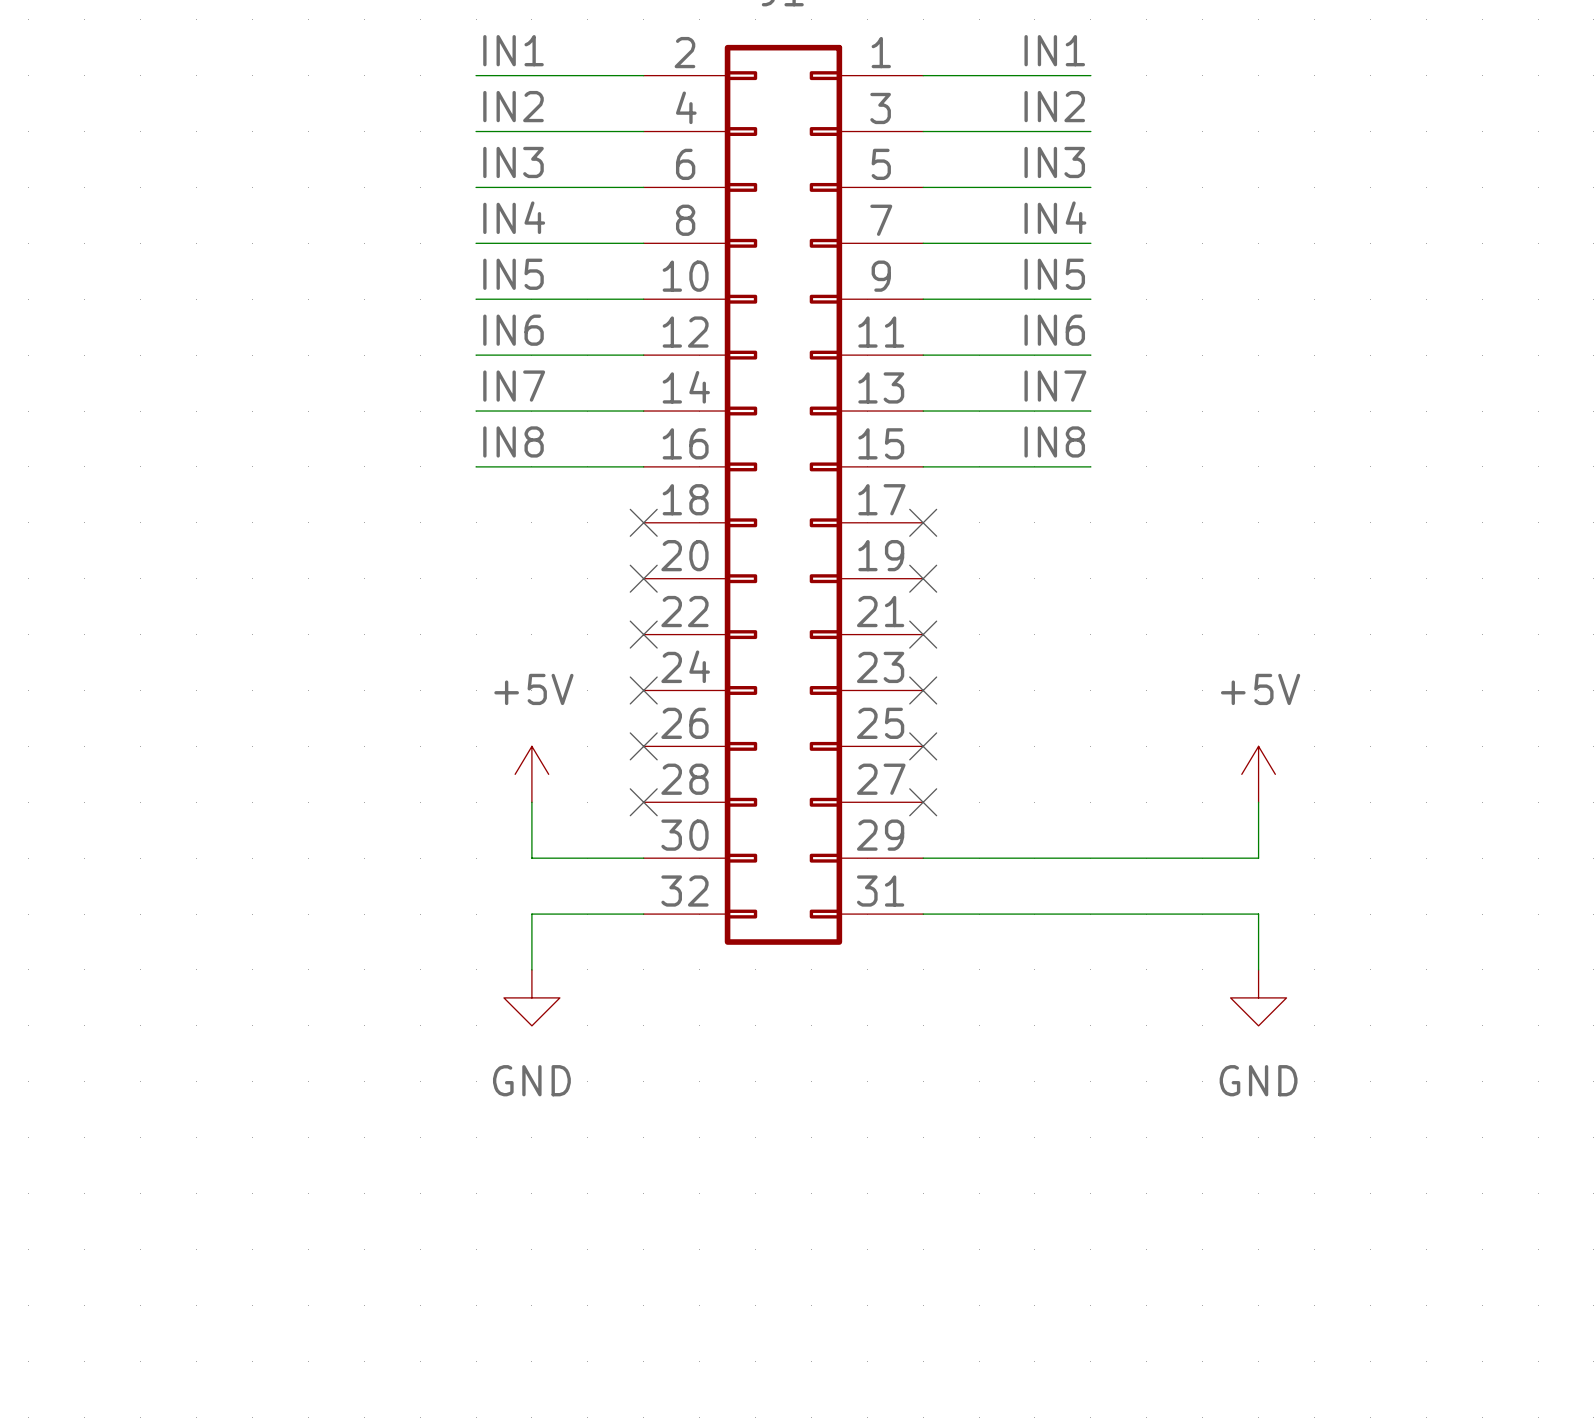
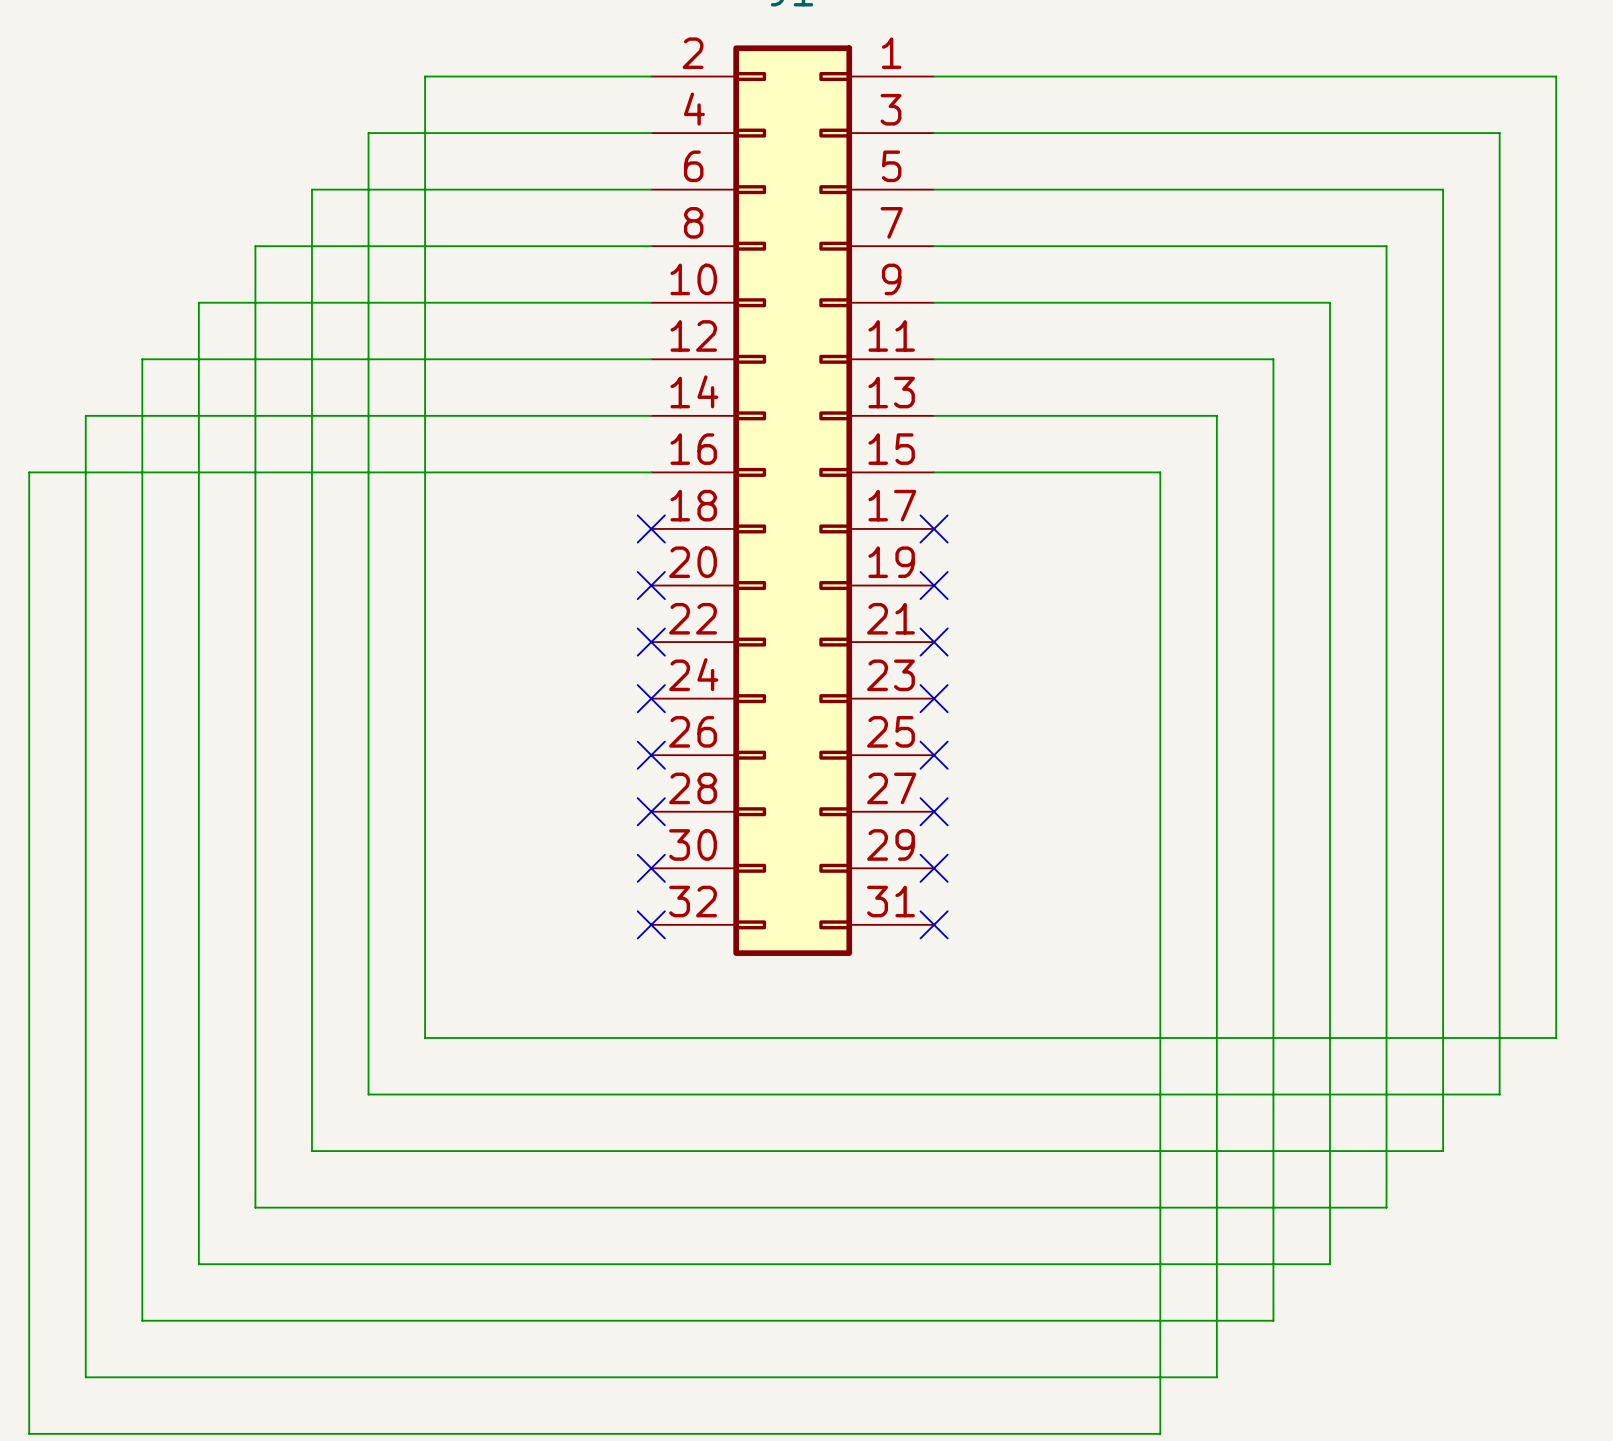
label: IN1 (513, 50) -> none
label: IN1 (1054, 50) -> none
wire: none -> (481, 76) (425, 76) (425, 1037) (1556, 1037) (1556, 76) (1103, 76)
label: IN2 (513, 106) -> none
label: IN2 (1054, 106) -> none
wire: none -> (481, 133) (368, 133) (368, 1094) (1499, 1094) (1499, 133) (1103, 133)
label: IN3 (513, 162) -> none
label: IN3 (1054, 162) -> none
wire: none -> (481, 189) (311, 189) (311, 1151) (1443, 1151) (1443, 189) (1103, 189)
label: IN4 (514, 217) -> none
label: IN4 (1055, 217) -> none
wire: none -> (481, 246) (255, 246) (255, 1207) (1386, 1207) (1386, 246) (1103, 246)
label: IN5 (513, 274) -> none
label: IN5 (1054, 274) -> none
wire: none -> (481, 302) (198, 302) (198, 1264) (1329, 1264) (1329, 302) (1103, 302)
label: IN6 (513, 330) -> none
label: IN6 (1054, 330) -> none
wire: none -> (481, 359) (142, 359) (142, 1320) (1273, 1320) (1273, 981)
wire: none -> (1103, 359) (1273, 359) (1273, 811)
label: IN7 (514, 386) -> none
label: IN7 (1055, 386) -> none
wire: none -> (481, 415) (85, 415) (85, 1377) (1216, 1377) (1216, 415) (1103, 415)
label: IN8 (513, 441) -> none
label: IN8 (1054, 441) -> none
wire: none -> (481, 472) (29, 472) (29, 1433) (1160, 1433) (1160, 472) (1103, 472)
power symbol: +5V (531, 774) -> none
power symbol: +5V (1258, 774) -> none
wire: (531, 802) (531, 858) (643, 858) -> none
no-connect mark: none -> (651, 868)
wire: (923, 858) (1258, 858) -> (1273, 924) (1273, 868)
no-connect mark: none -> (934, 868)
wire: (643, 914) (531, 914) (531, 969) -> none
no-connect mark: none -> (651, 924)
wire: (923, 914) (1258, 914) -> none
no-connect mark: none -> (934, 924)
power symbol: GND (531, 997) -> none
power symbol: GND (1258, 997) -> none

